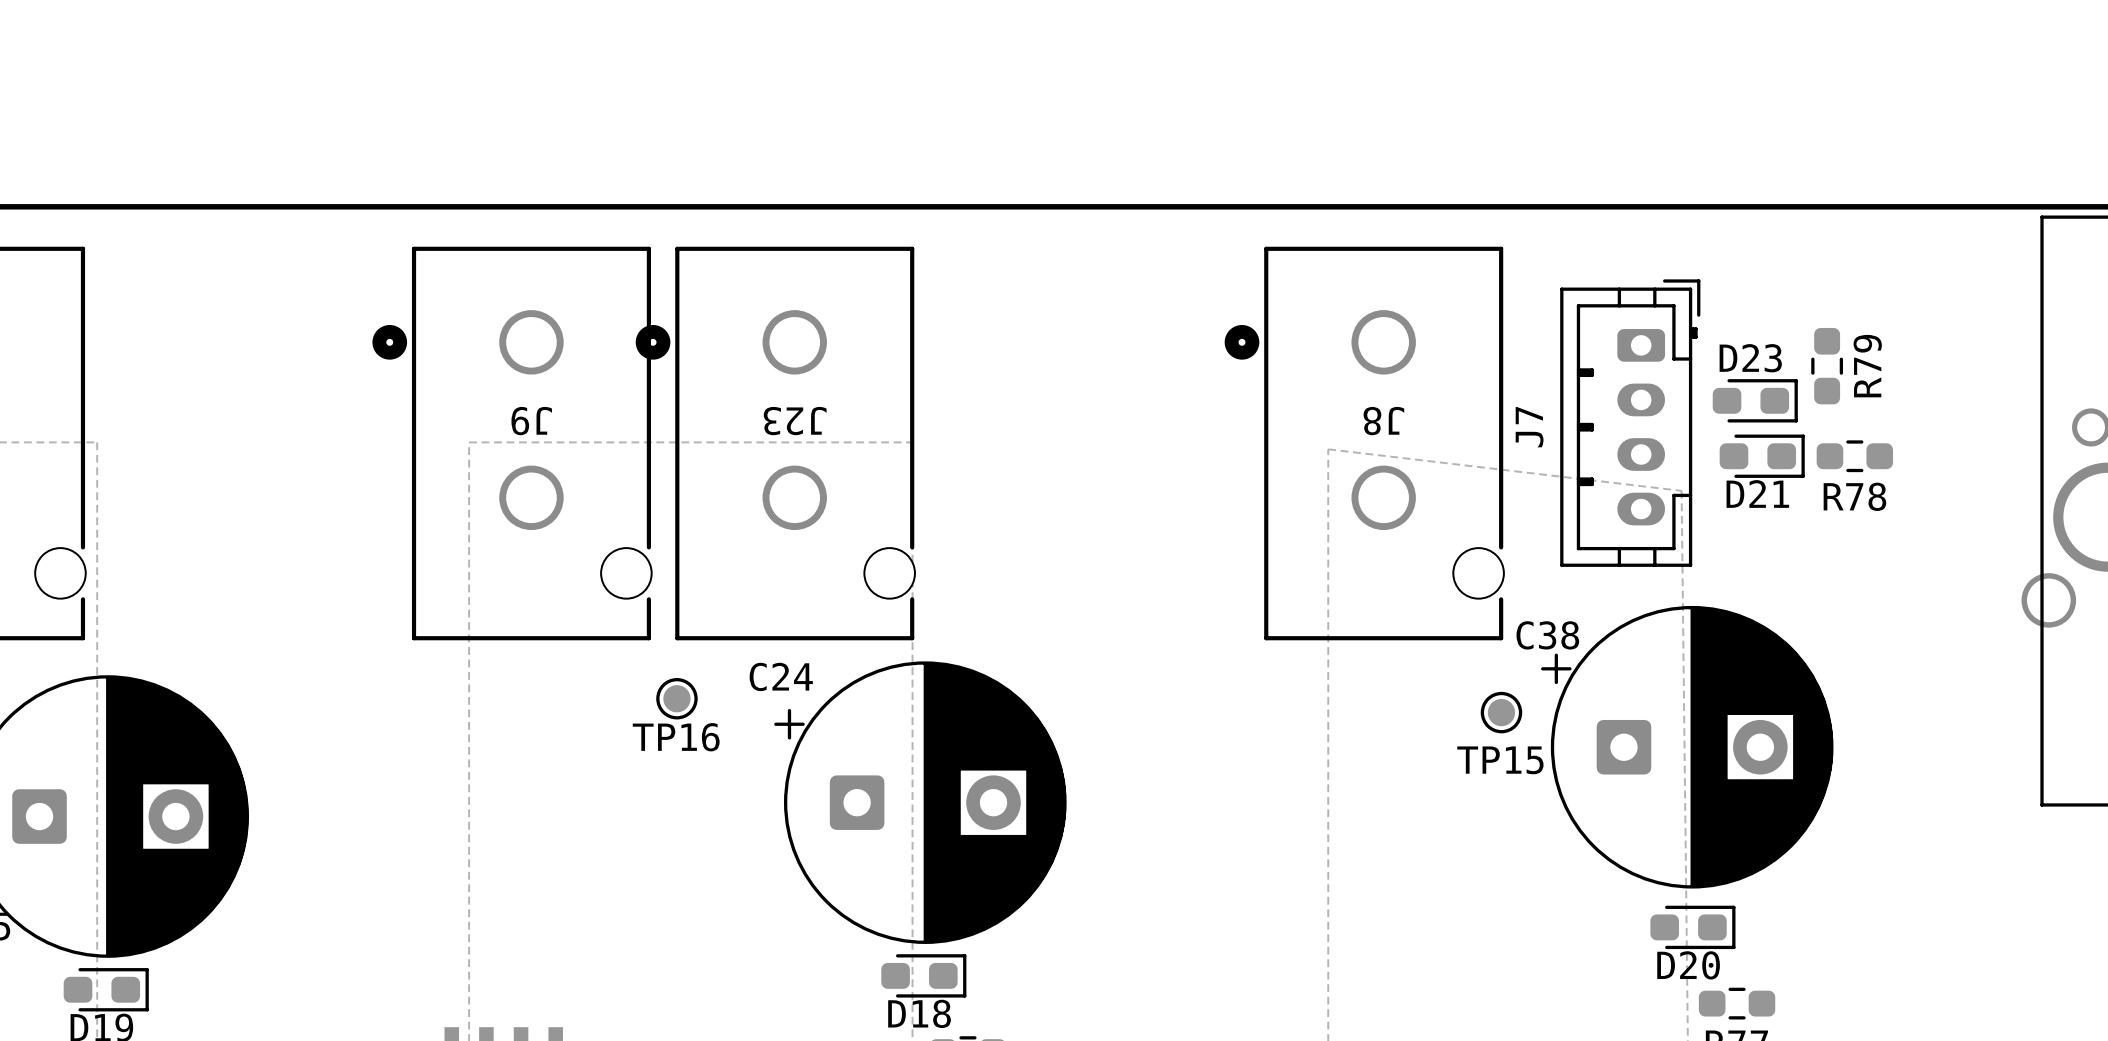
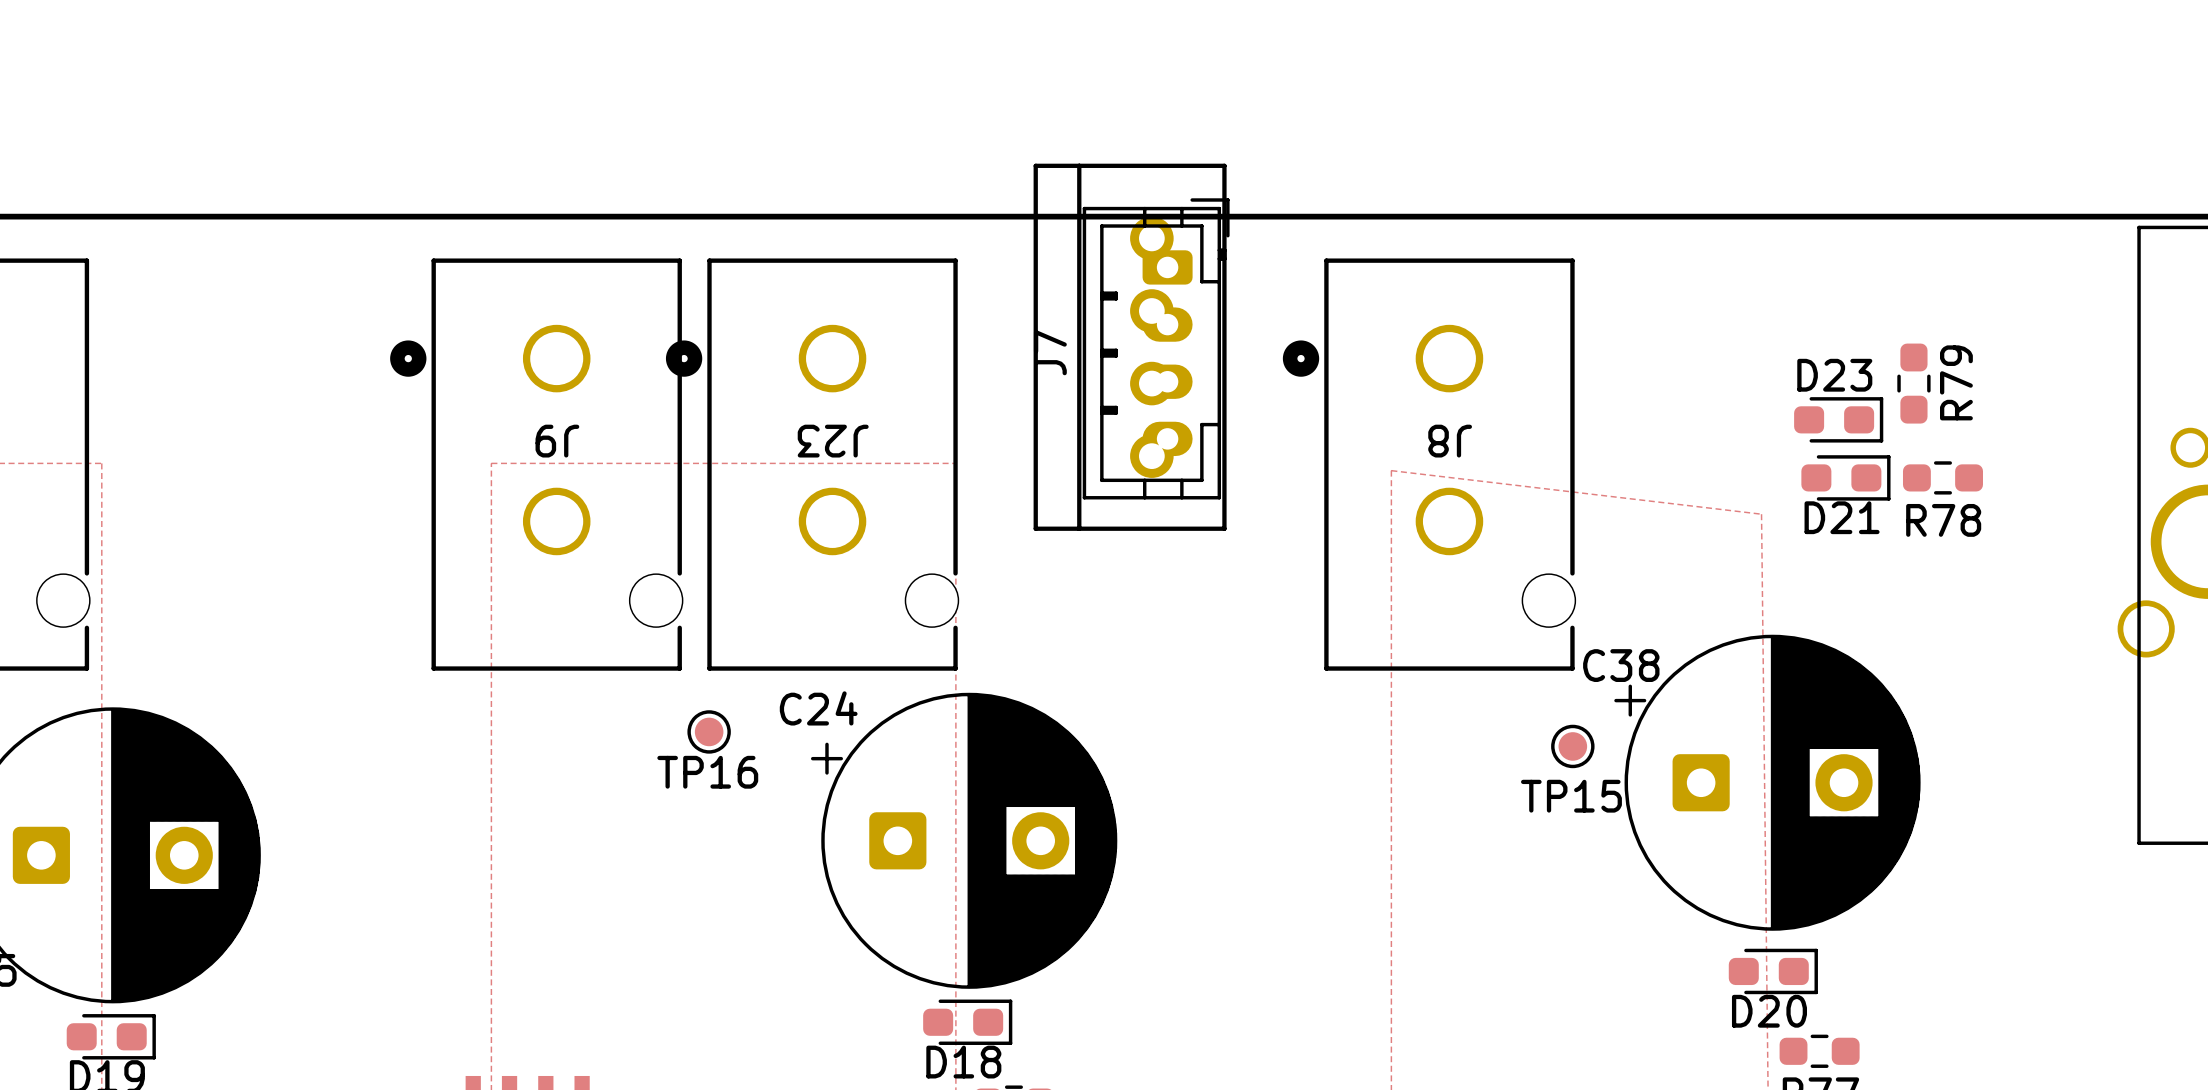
part: none -> (1130, 347)
J7 position: (1630, 423) -> (1156, 348)

